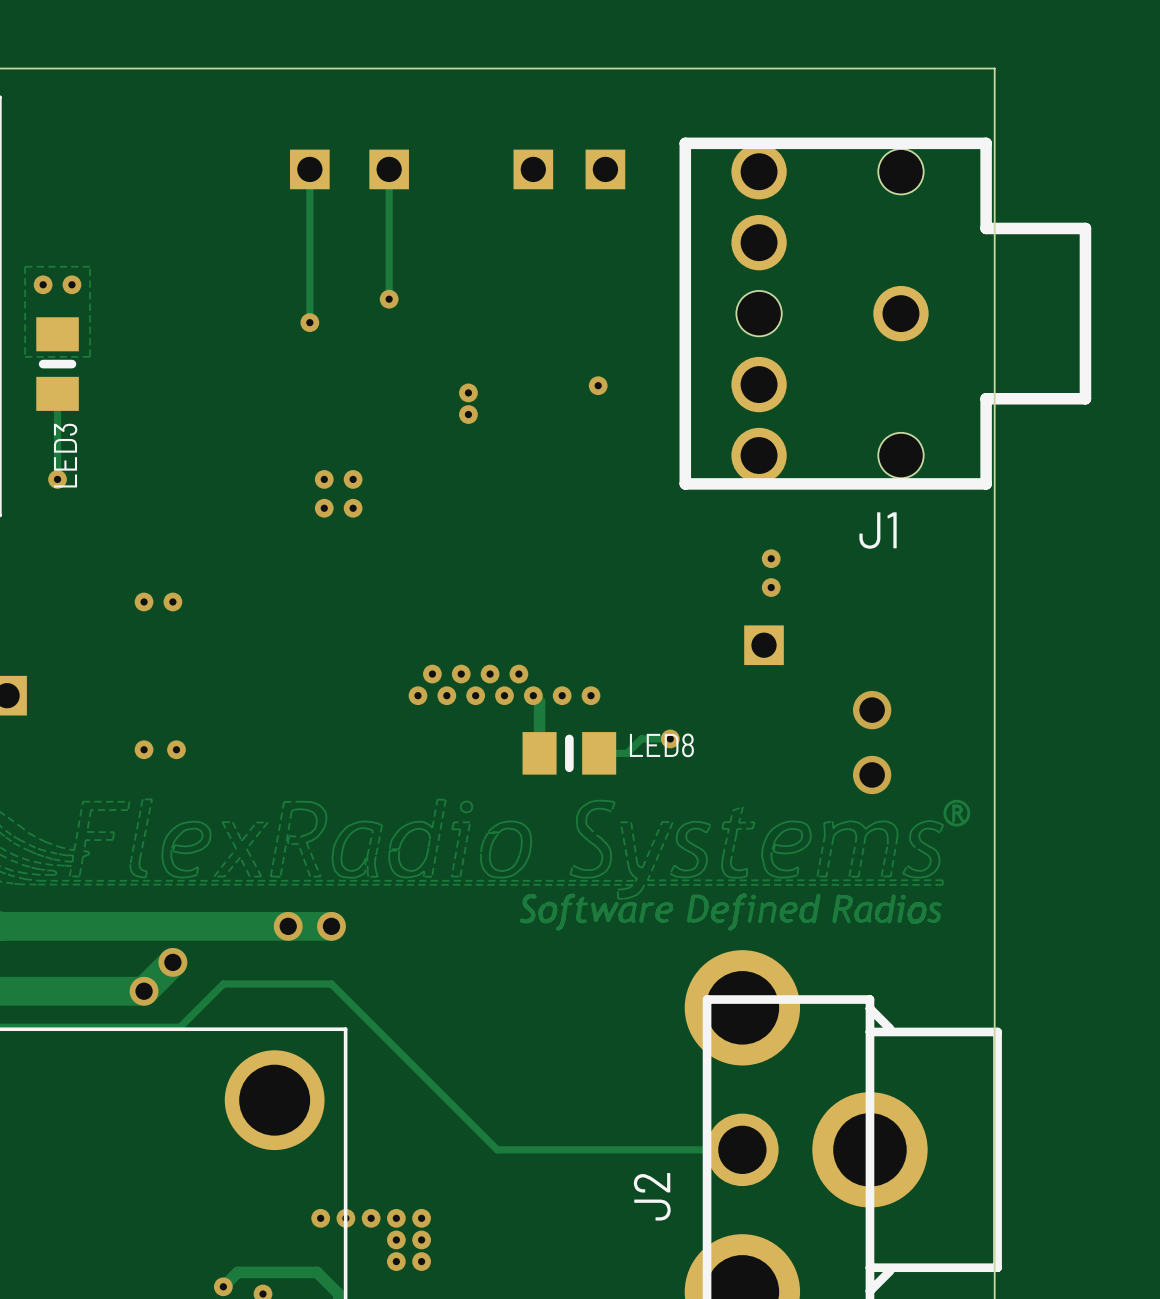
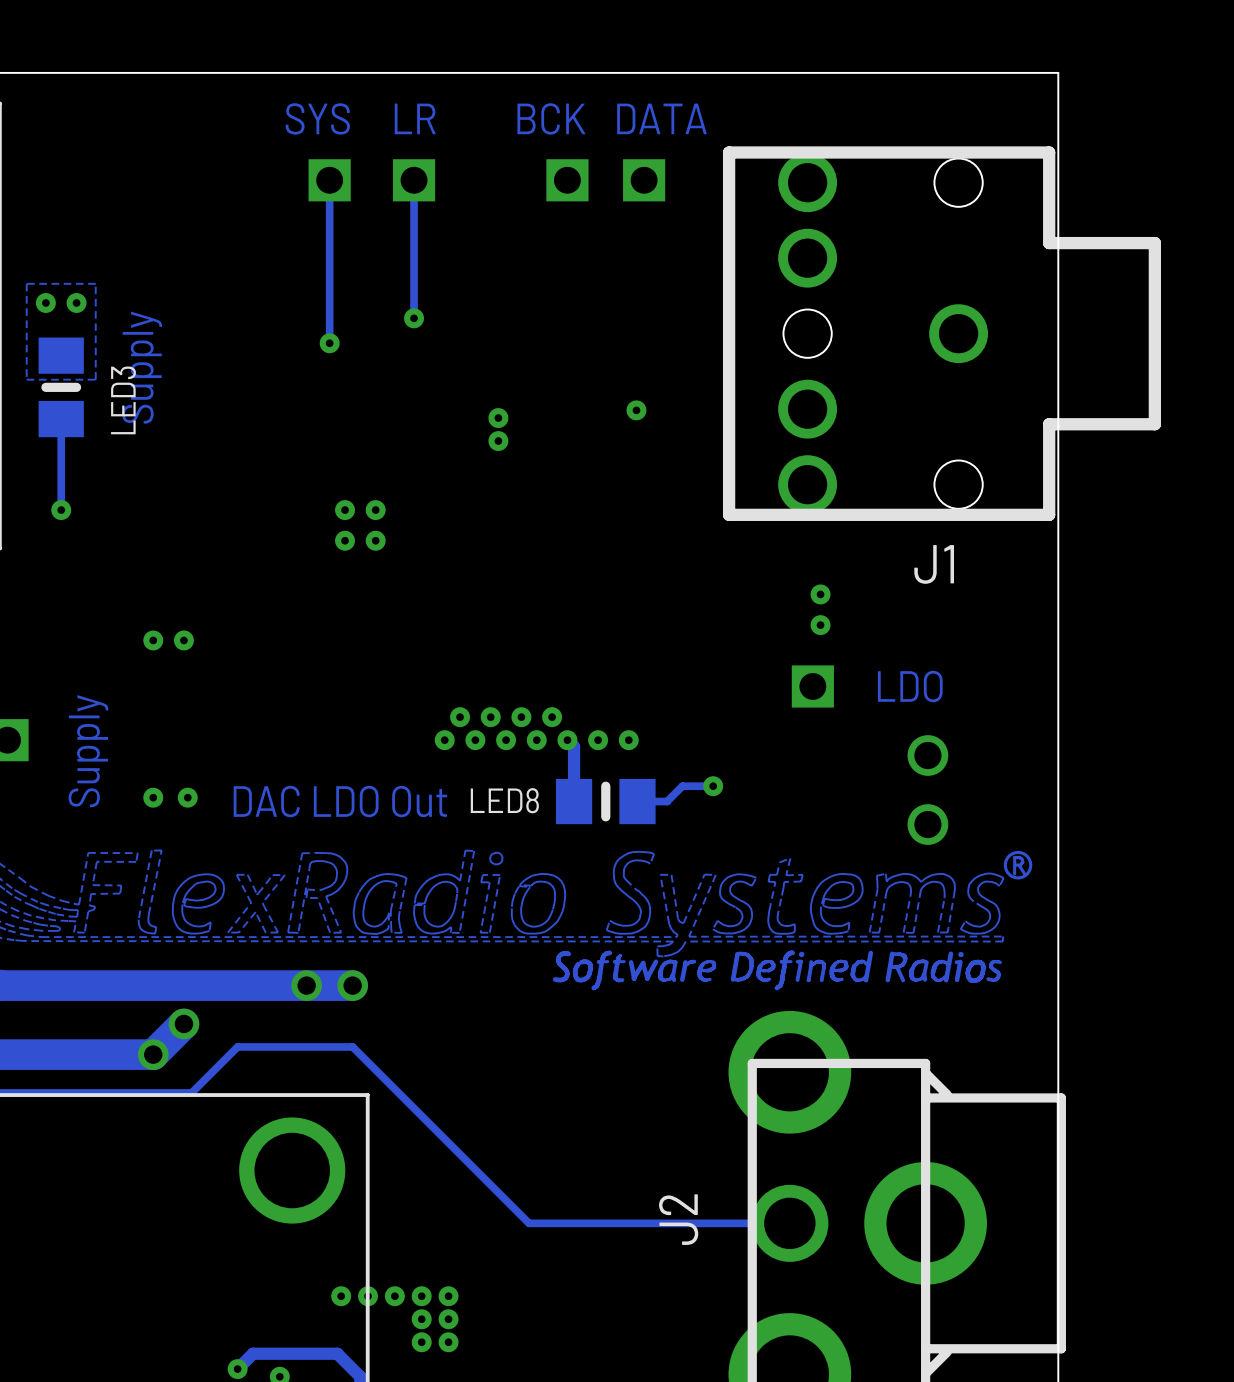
text: none -> SYS (317, 118)
text: none -> LR (415, 118)
text: none -> BCK (551, 118)
text: none -> DATA (661, 118)
text: none -> Supply (142, 367)
LED3 name position: LED3 (65, 455) -> LED3 (123, 400)
text: none -> LDO (910, 686)
text: none -> Supply (88, 751)
LED8 name position: LED8 (661, 745) -> LED8 (504, 800)
text: none -> DAC LDO Out (340, 801)
J2 name position: J2 (652, 1196) -> J2 (678, 1219)

